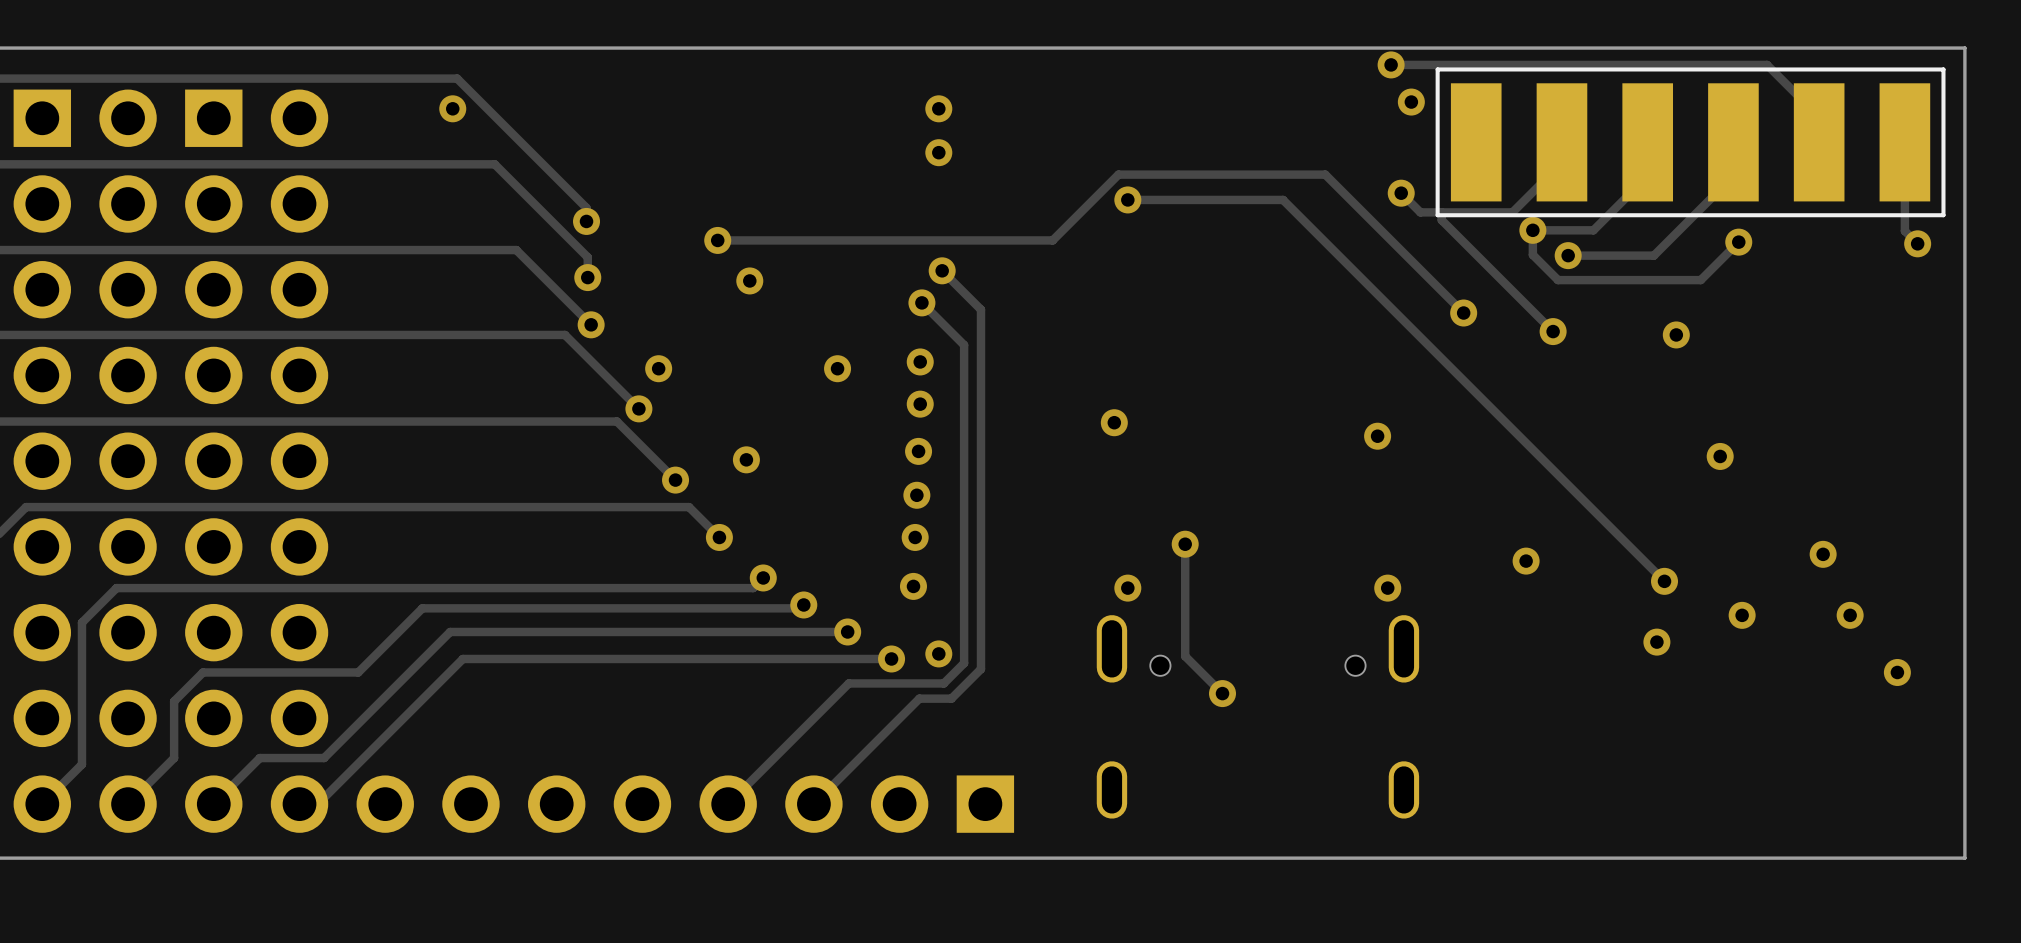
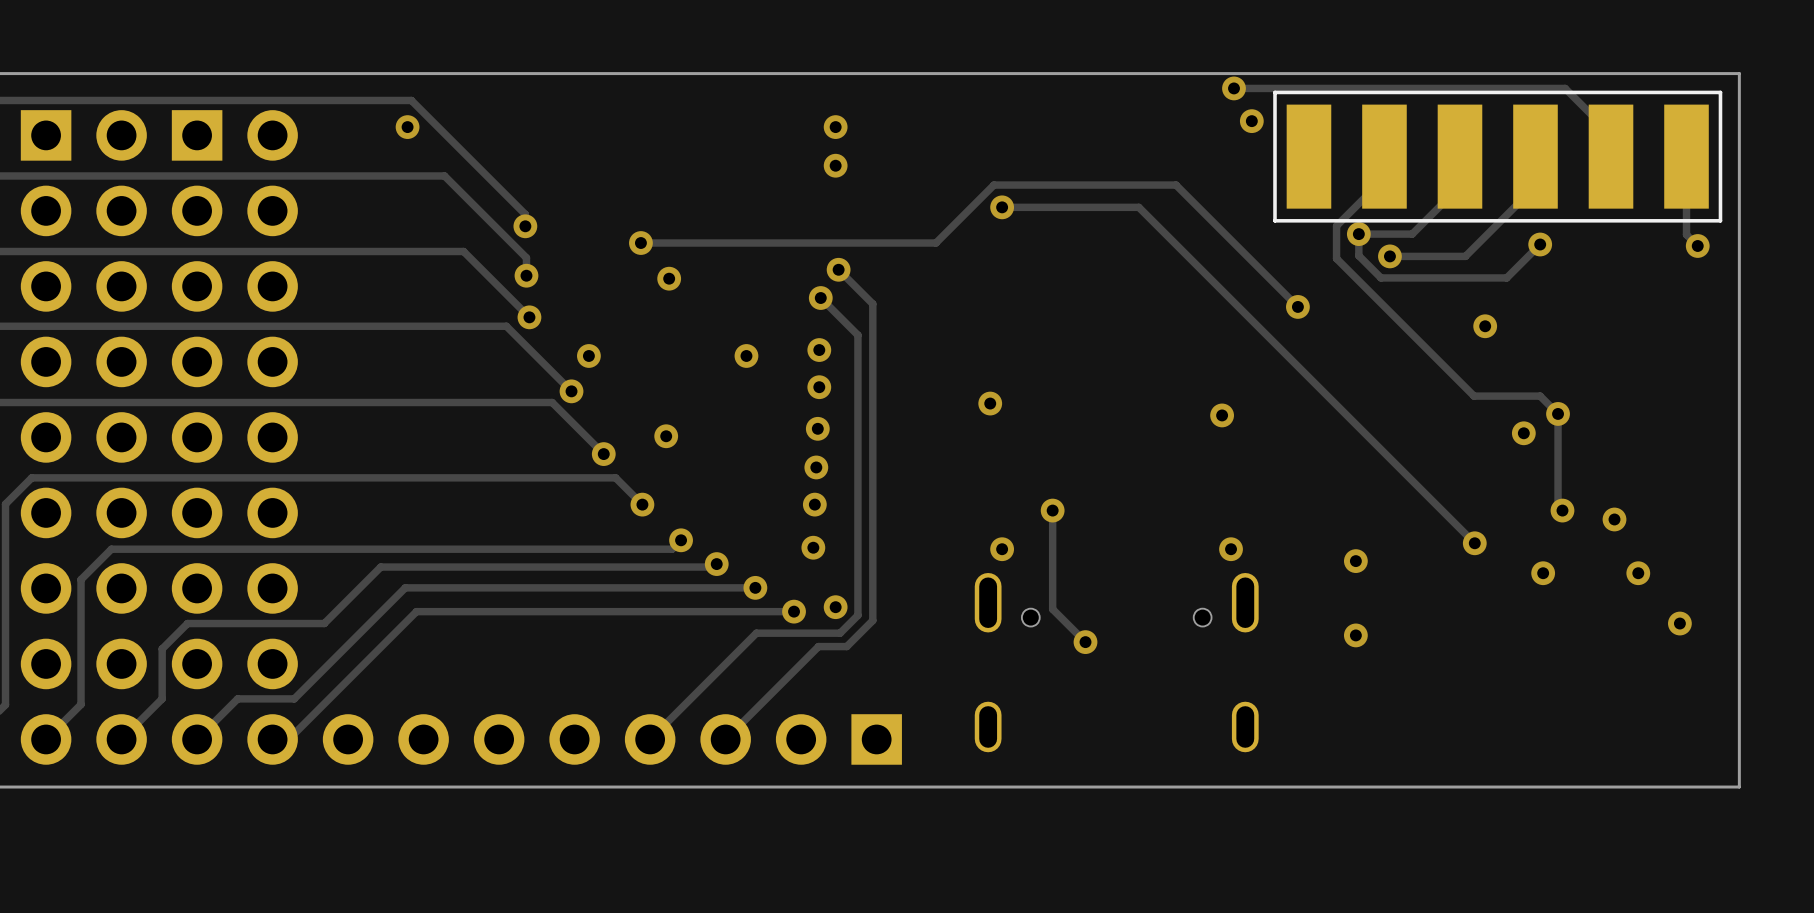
track: (1561, 162) (1512, 212) (1420, 212) (1401, 193) -> (1384, 174) (1384, 177) (1336, 225) (1336, 258) (1474, 396) (1540, 396) (1558, 413) (1558, 506) (1562, 510)
via: (1401, 193) -> none
track: (1441, 212) (1441, 220) (1553, 331) -> none
via: (1553, 331) -> none
via: none -> (1558, 413)
via: none -> (1562, 510)
via position: (1526, 561) -> (1355, 561)
via: (1656, 642) -> none
via: none -> (1355, 635)

